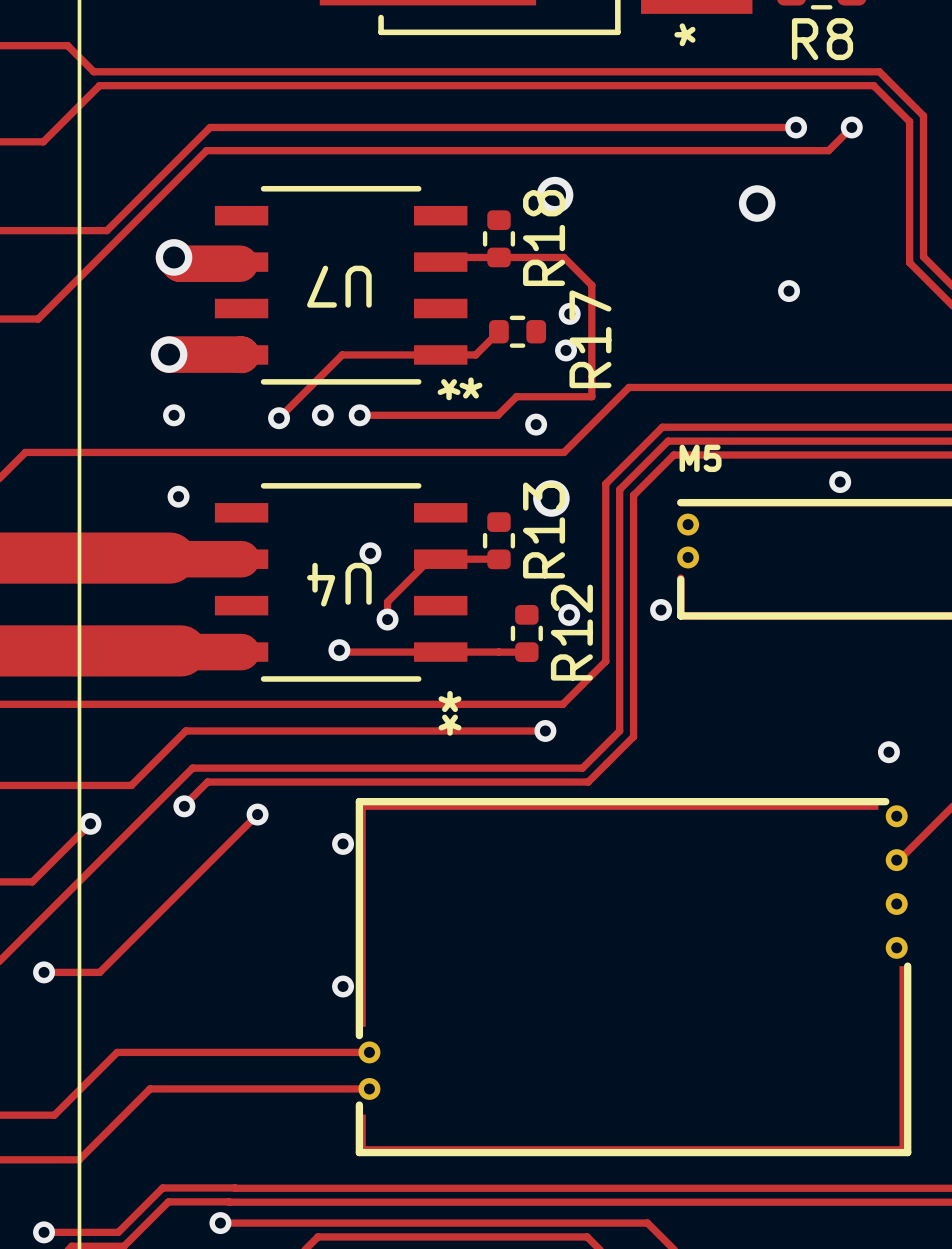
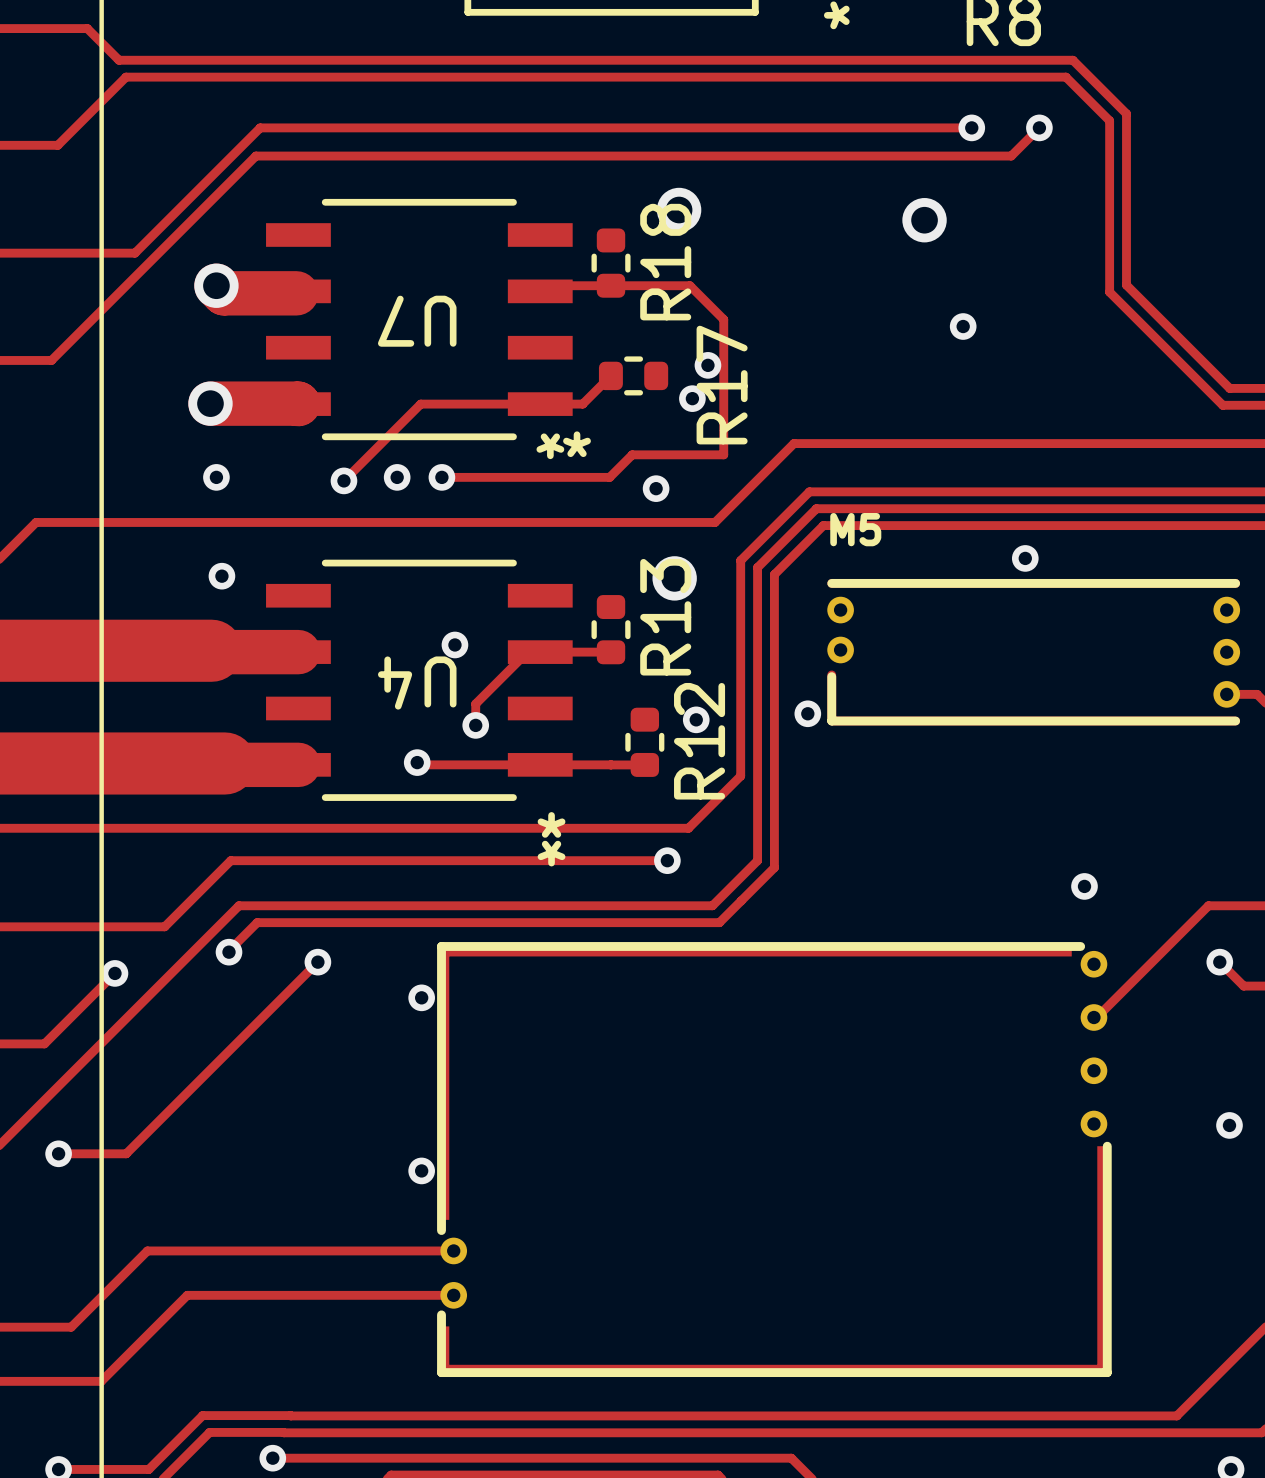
via position: (569, 313) -> (707, 365)
track: (649, 387) (628, 387) (563, 452) -> (793, 443) (715, 522) (689, 522)

